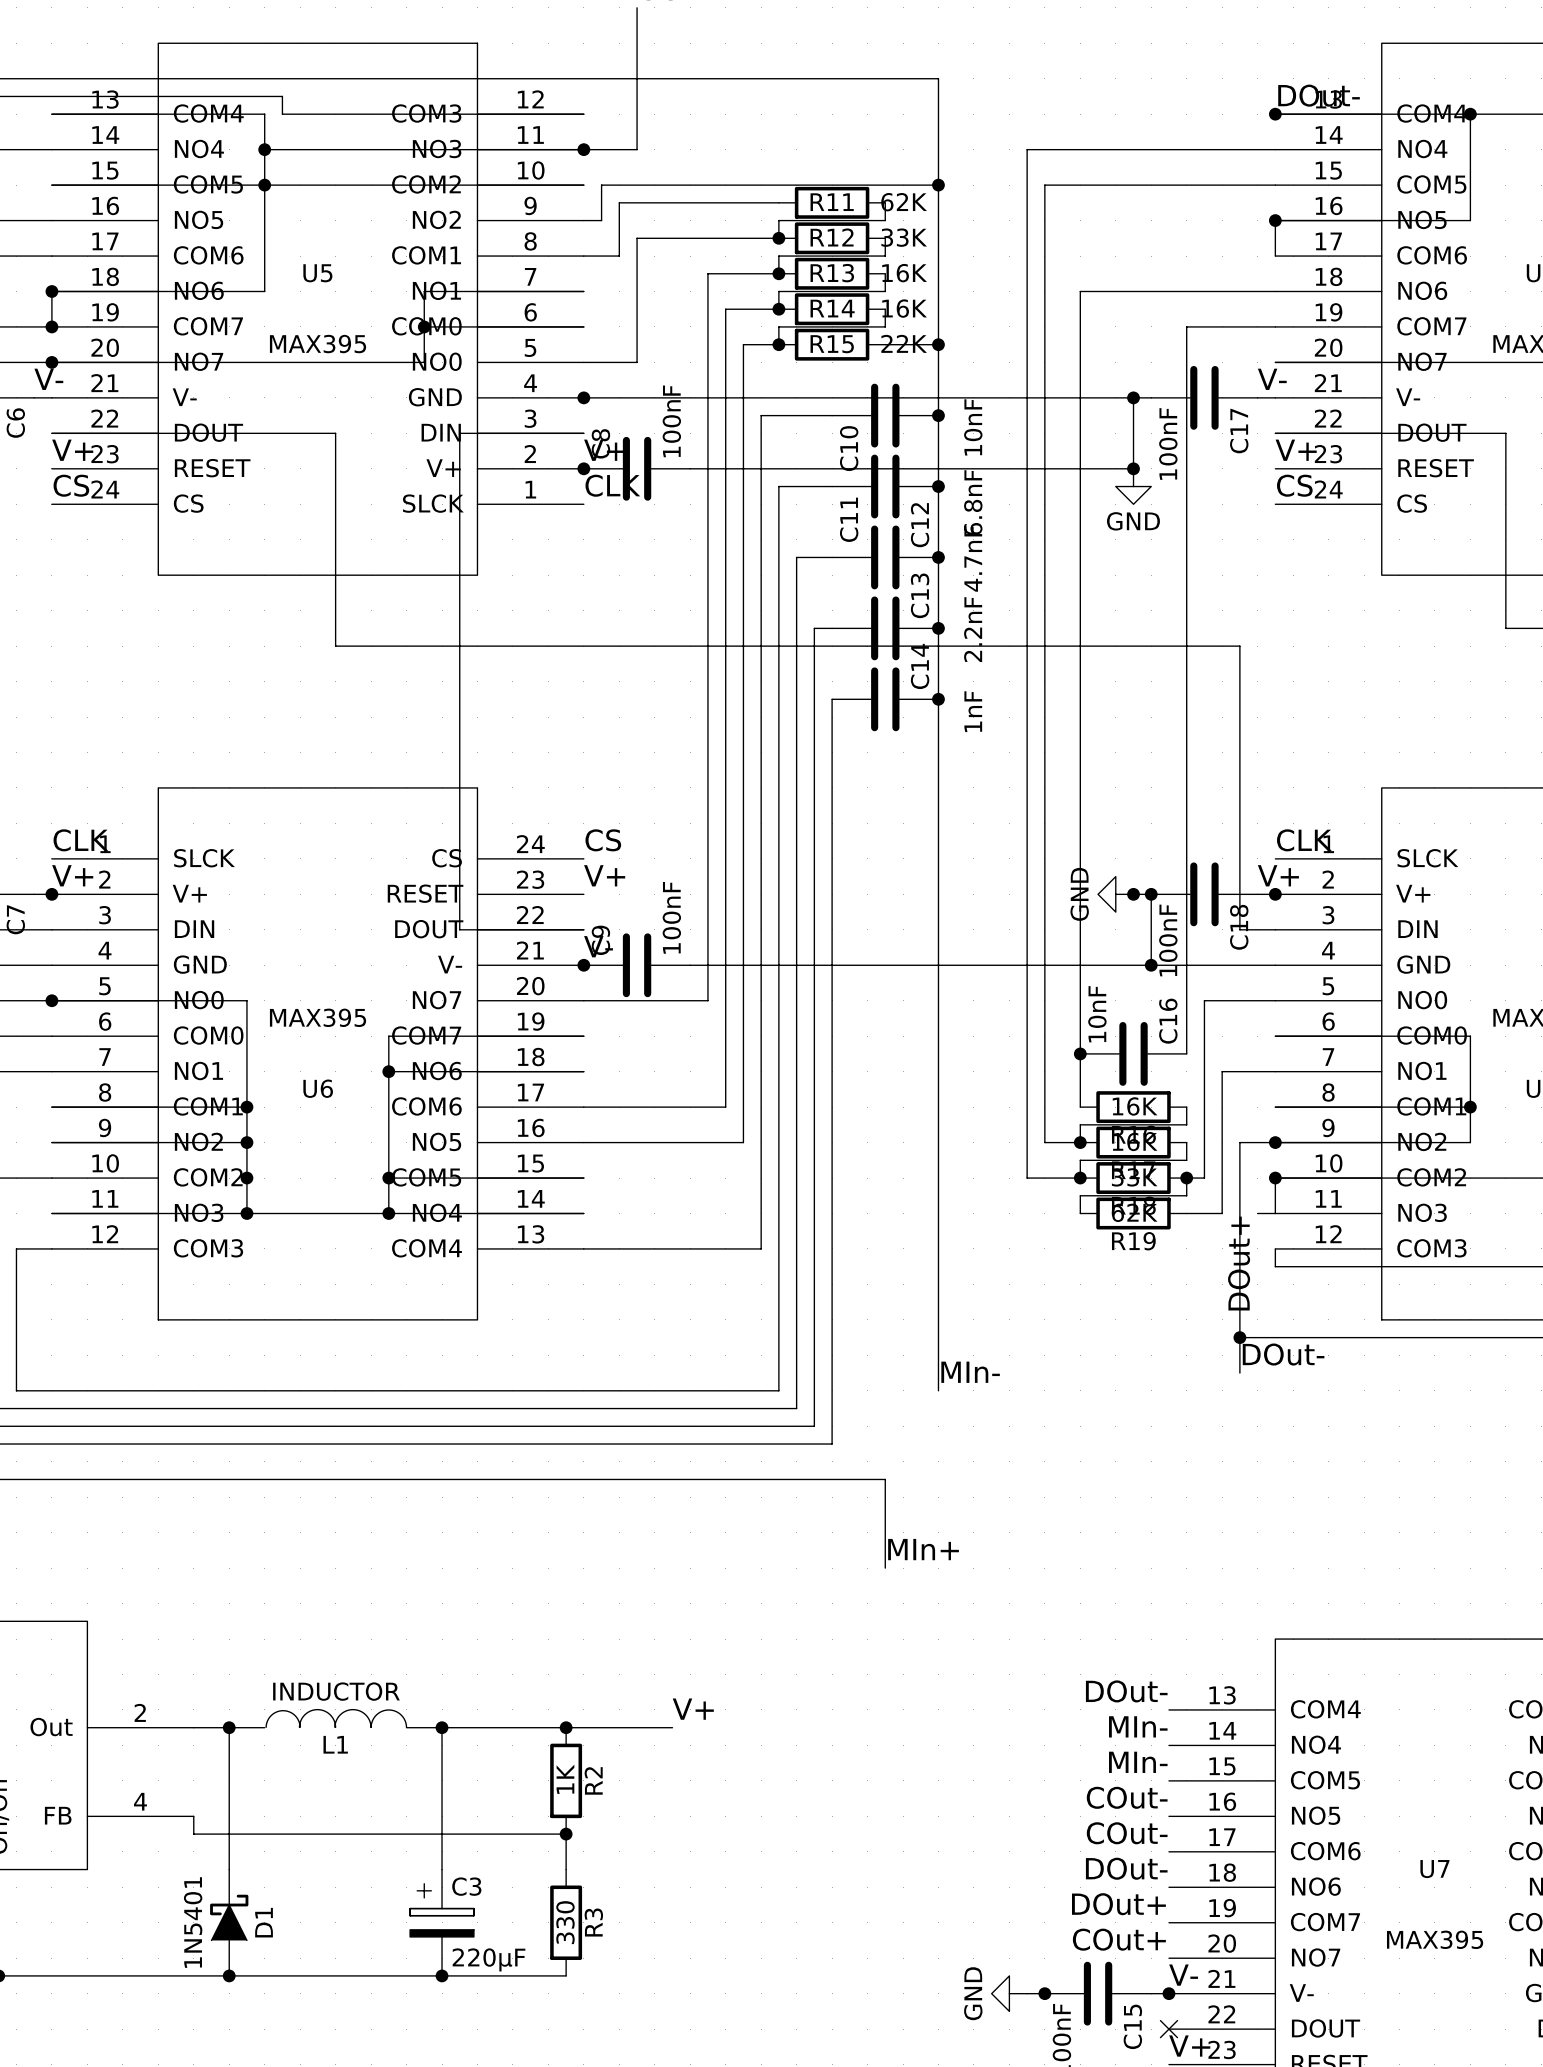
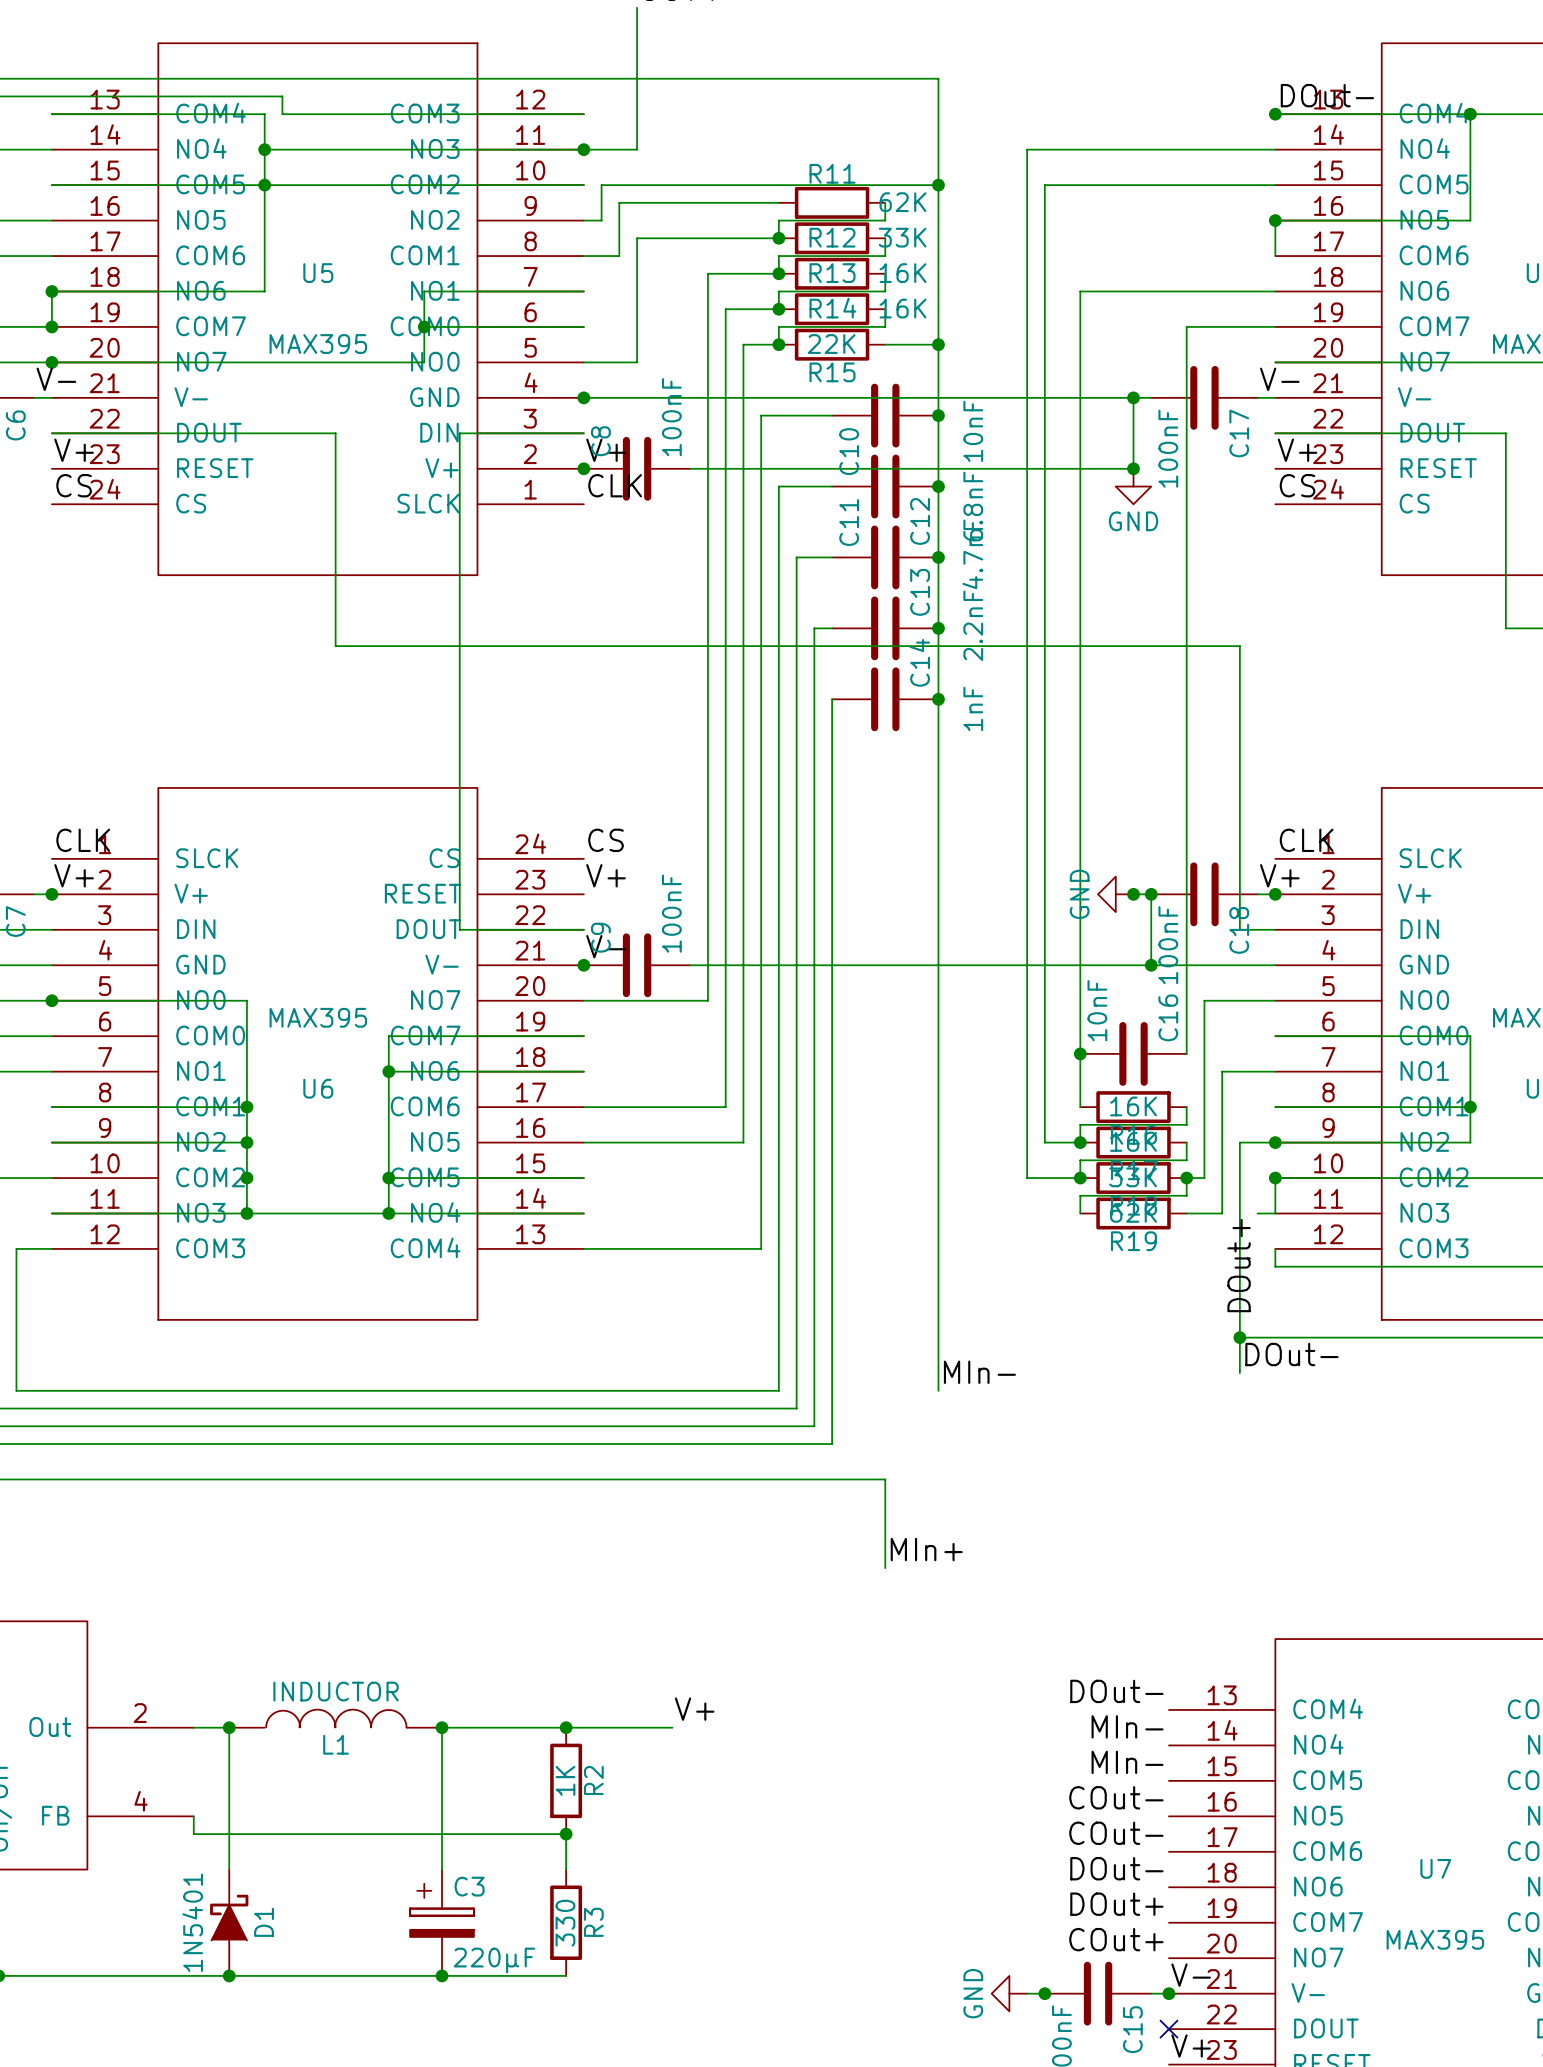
R11 name position: R11 (832, 202) -> R11 (832, 173)
R15 value position: 22K (904, 343) -> 22K (831, 344)
R15 name position: R15 (832, 344) -> R15 (832, 372)

